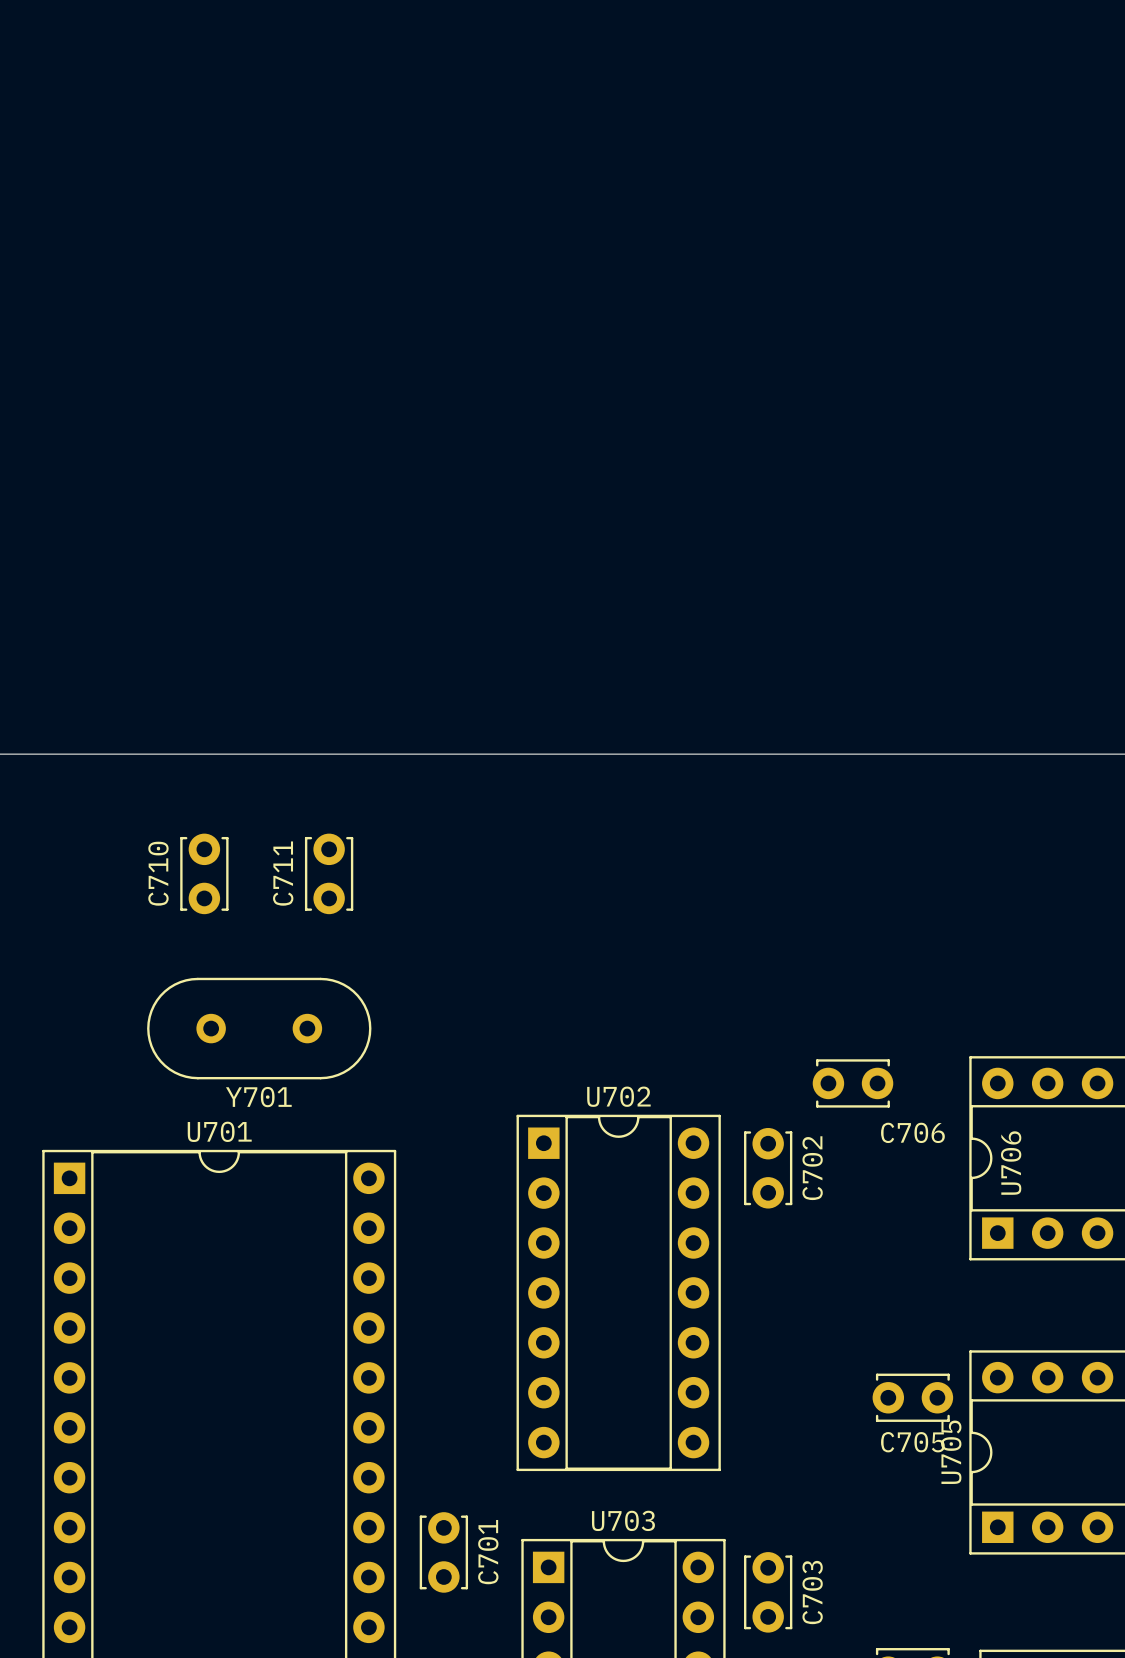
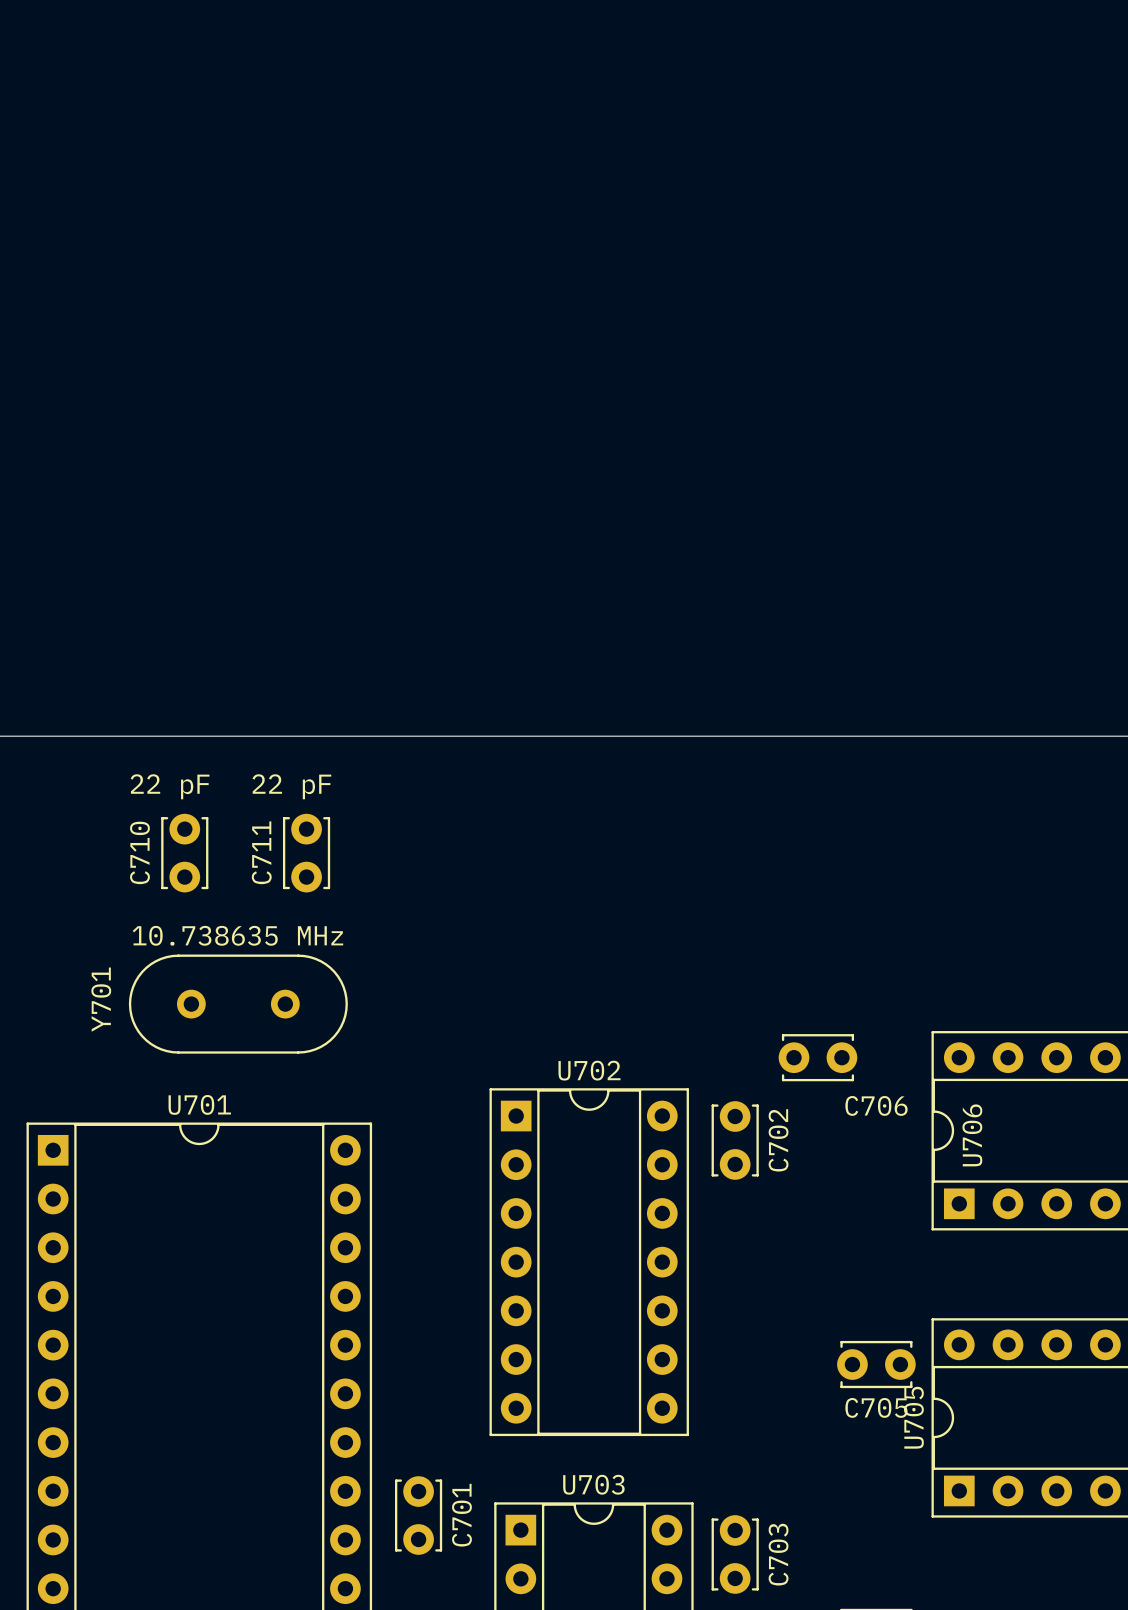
C710 value: none -> 22 pF (170, 786)
C711 value: none -> 22 pF (291, 786)
Y701 value: none -> 10.738635 MHz (237, 935)
Y701 name rotation: 0° (258, 1097) -> 90° counterclockwise (101, 999)
Y701 name position: Y701 (258, 1097) -> Y701 (101, 999)

